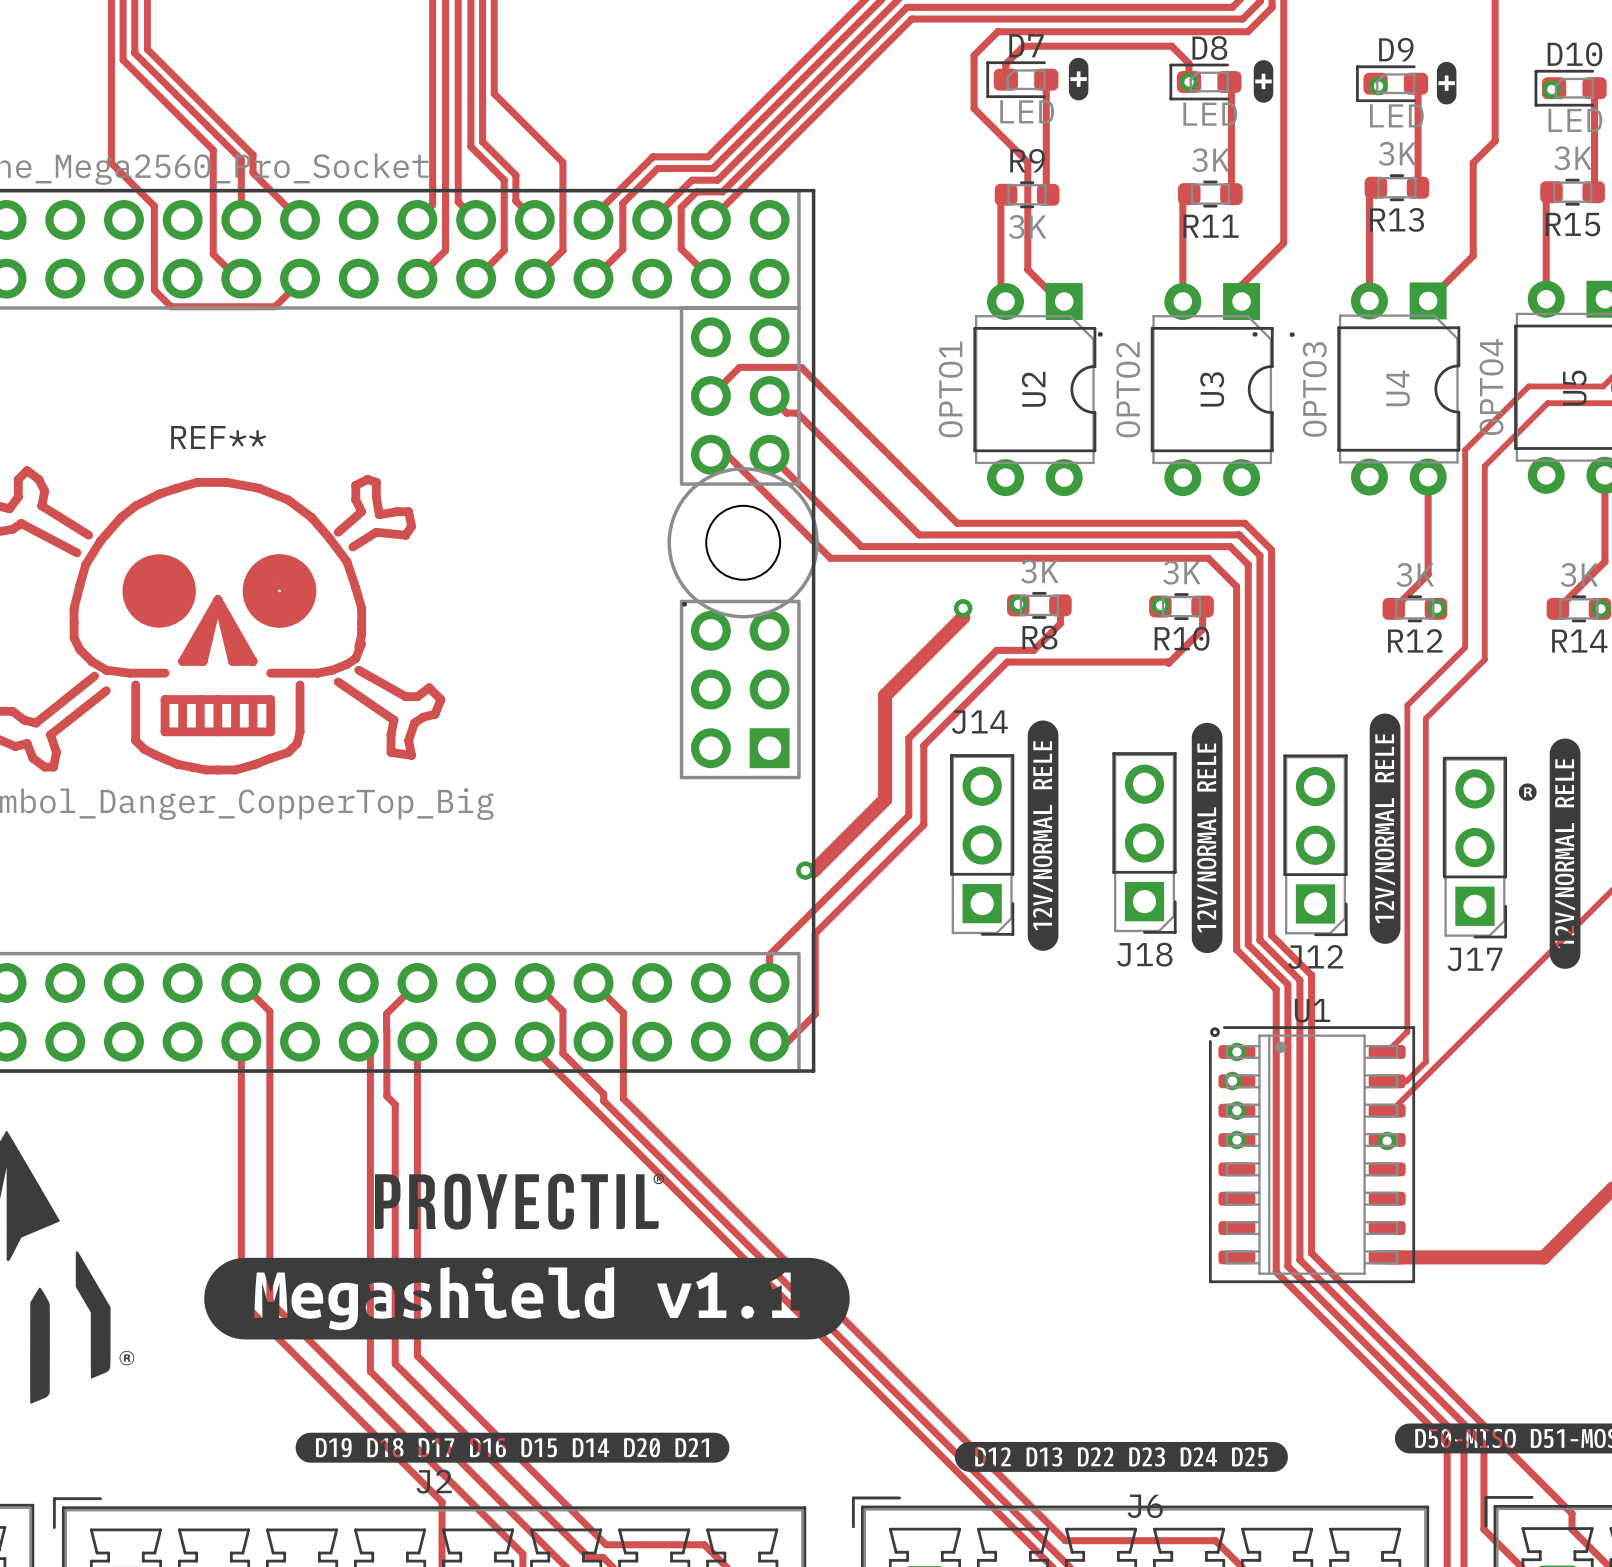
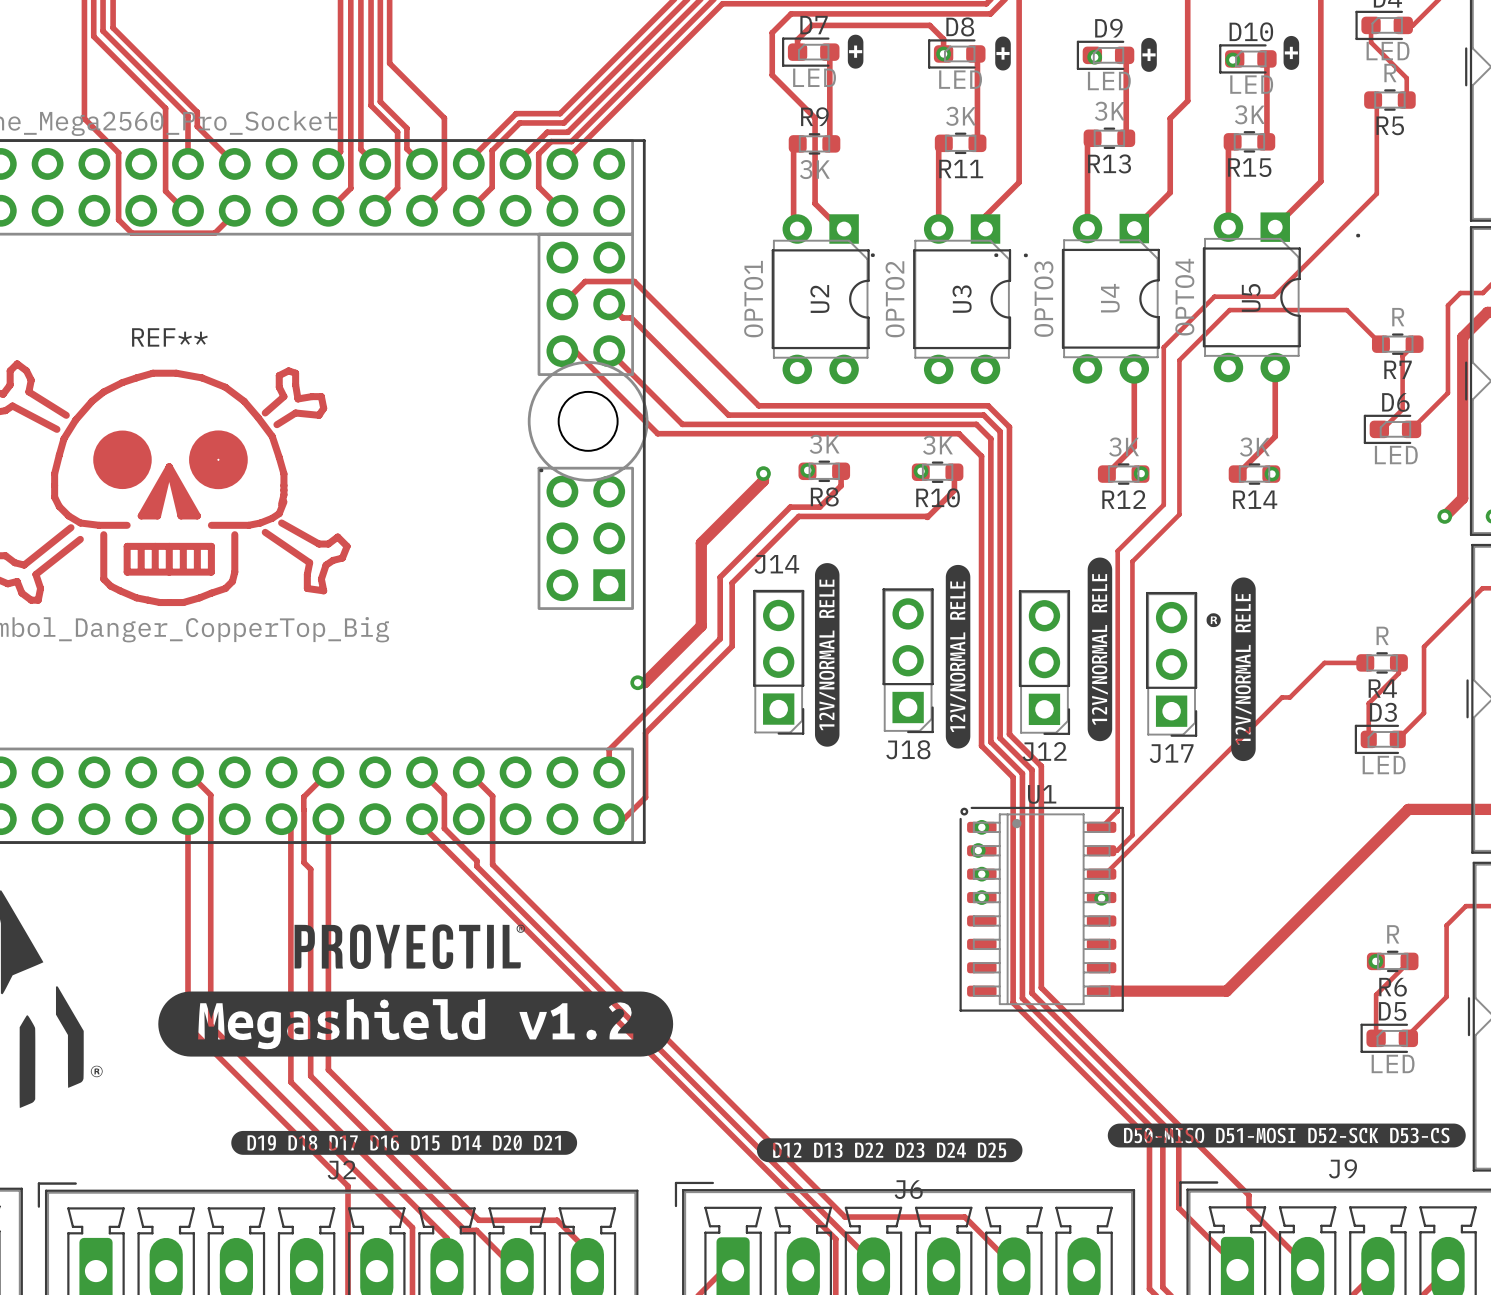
drawing shape: [204, 1257, 850, 1340] -> [158, 991, 674, 1057]

